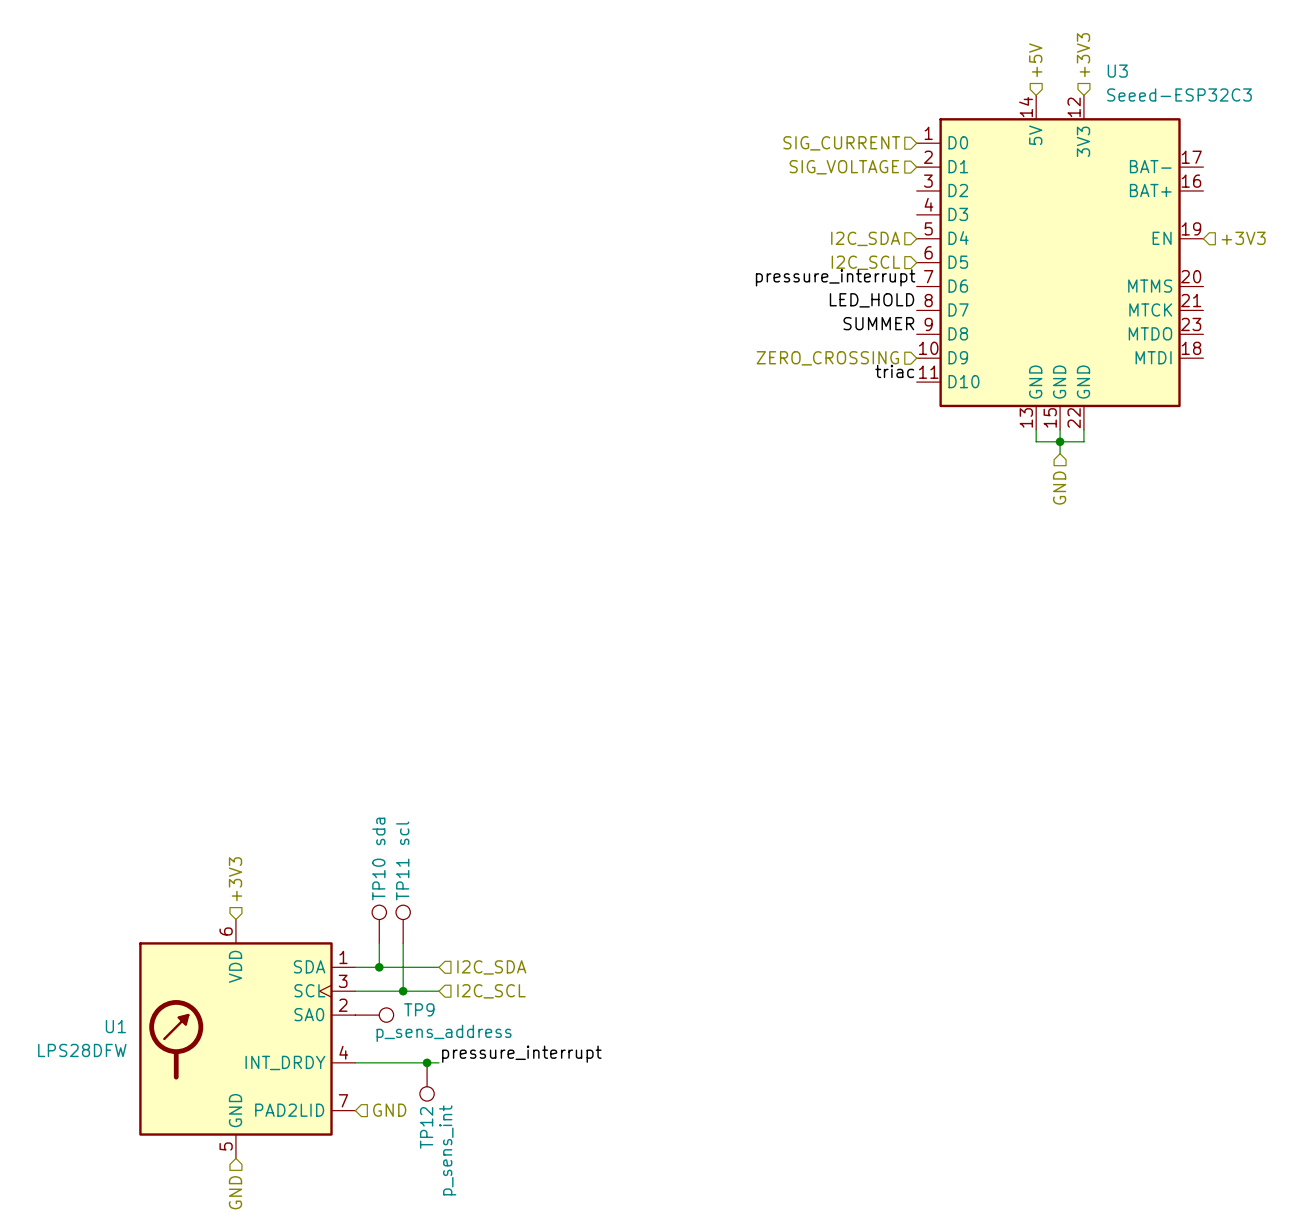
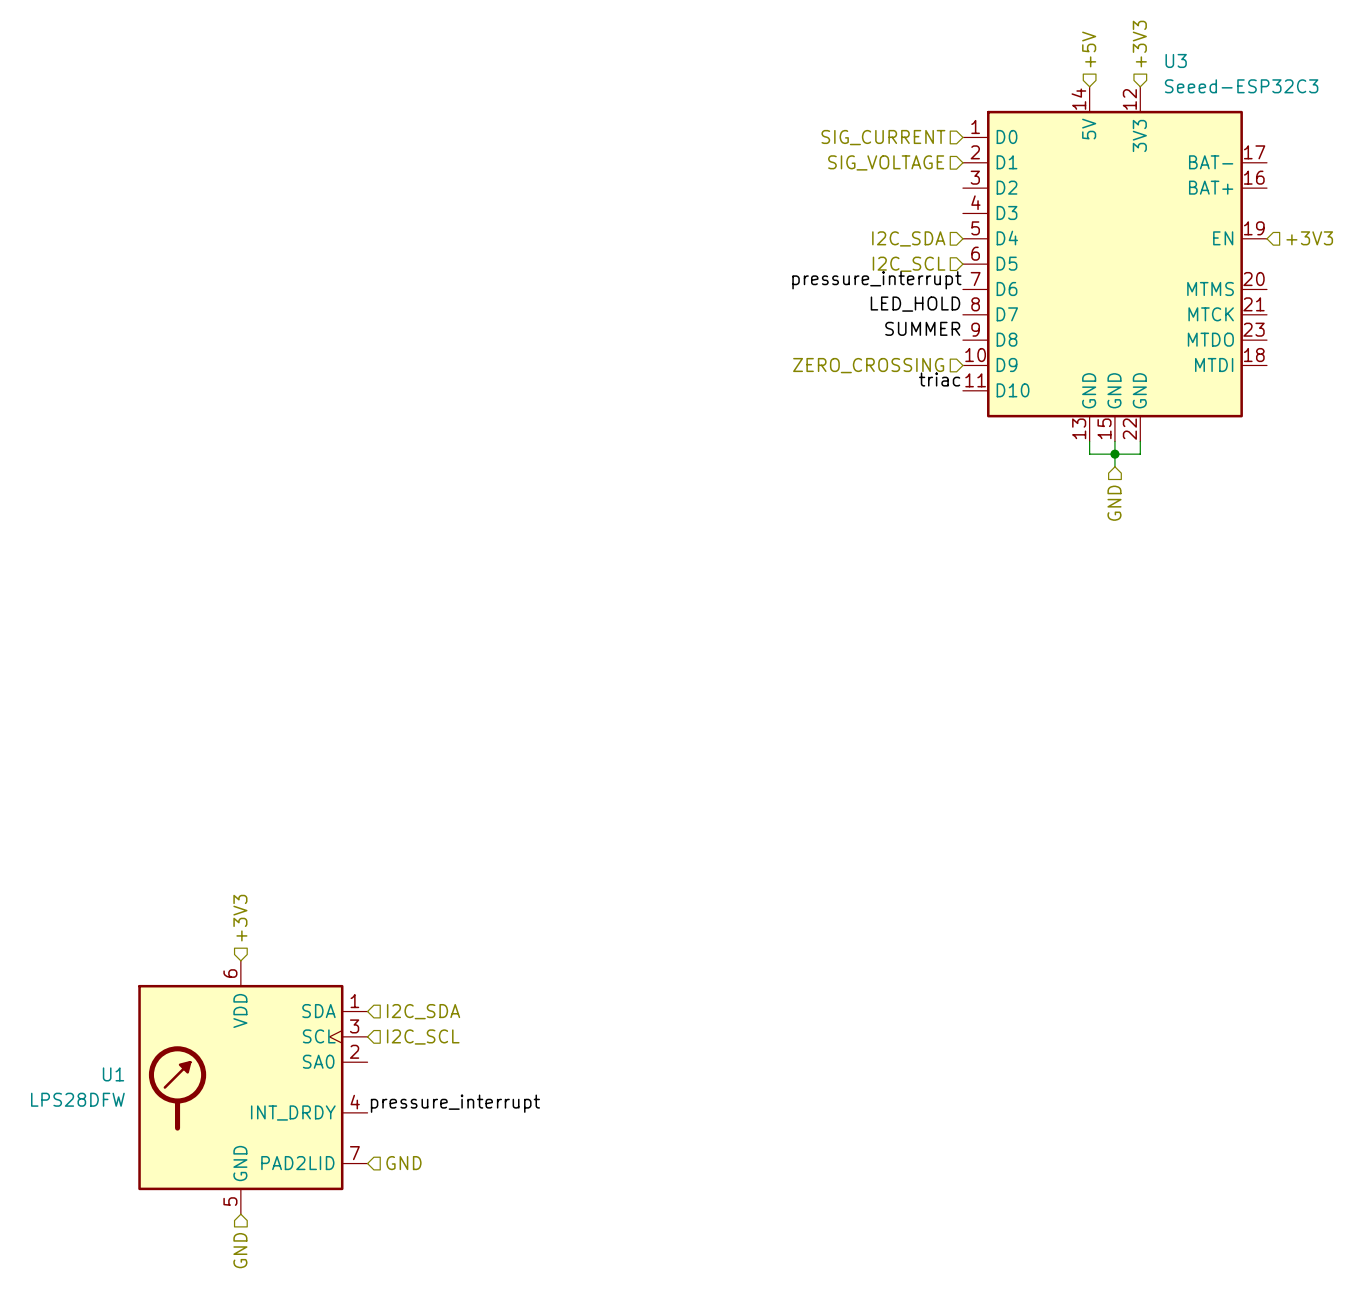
TP10: sda (379, 924) -> none
TP11: scl (403, 924) -> none
wire: (379, 943) (379, 967) -> none
wire: (403, 943) (403, 991) -> none
wire: (355, 967) (439, 967) -> none
junction: (379, 967) -> none
hierarchical label position: I2C_SDA (491, 967) -> I2C_SDA (423, 1011)
wire: (355, 991) (439, 991) -> none
junction: (403, 991) -> none
hierarchical label position: I2C_SCL (491, 991) -> I2C_SCL (423, 1037)
TP9: p_sens_address (374, 1015) -> none
label position: pressure_interrupt (521, 1054) -> pressure_interrupt (455, 1103)
wire: (355, 1062) (439, 1062) -> none
junction: (427, 1062) -> none
TP12: p_sens_int (427, 1081) -> none

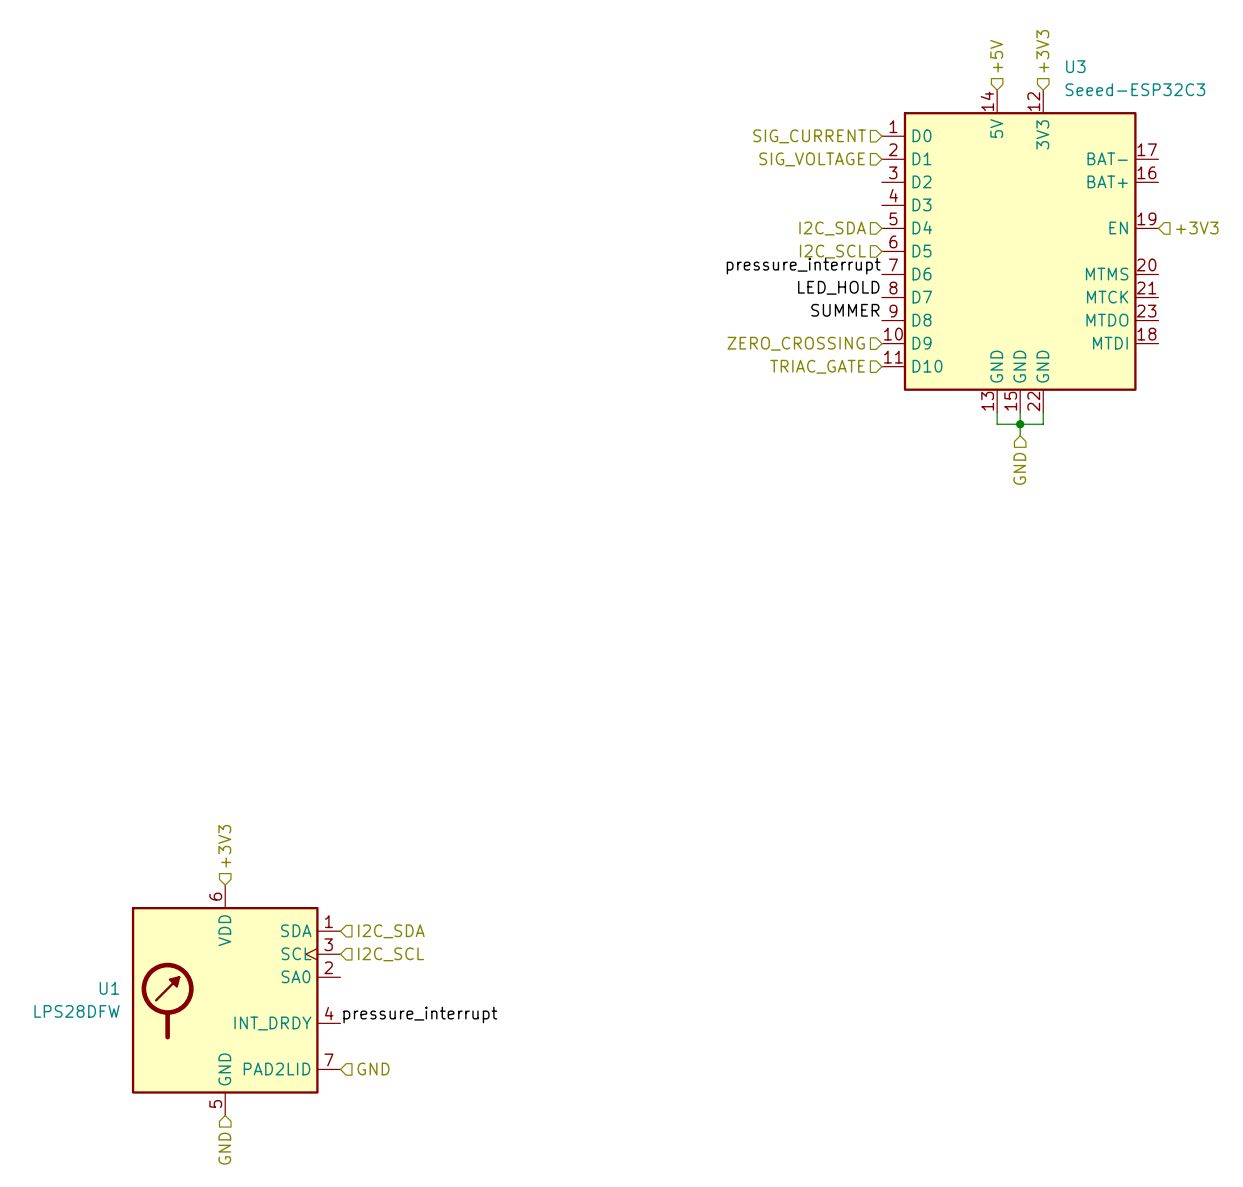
label: triac (939, 379) -> none
hierarchical label: none -> TRIAC_GATE (817, 366)

